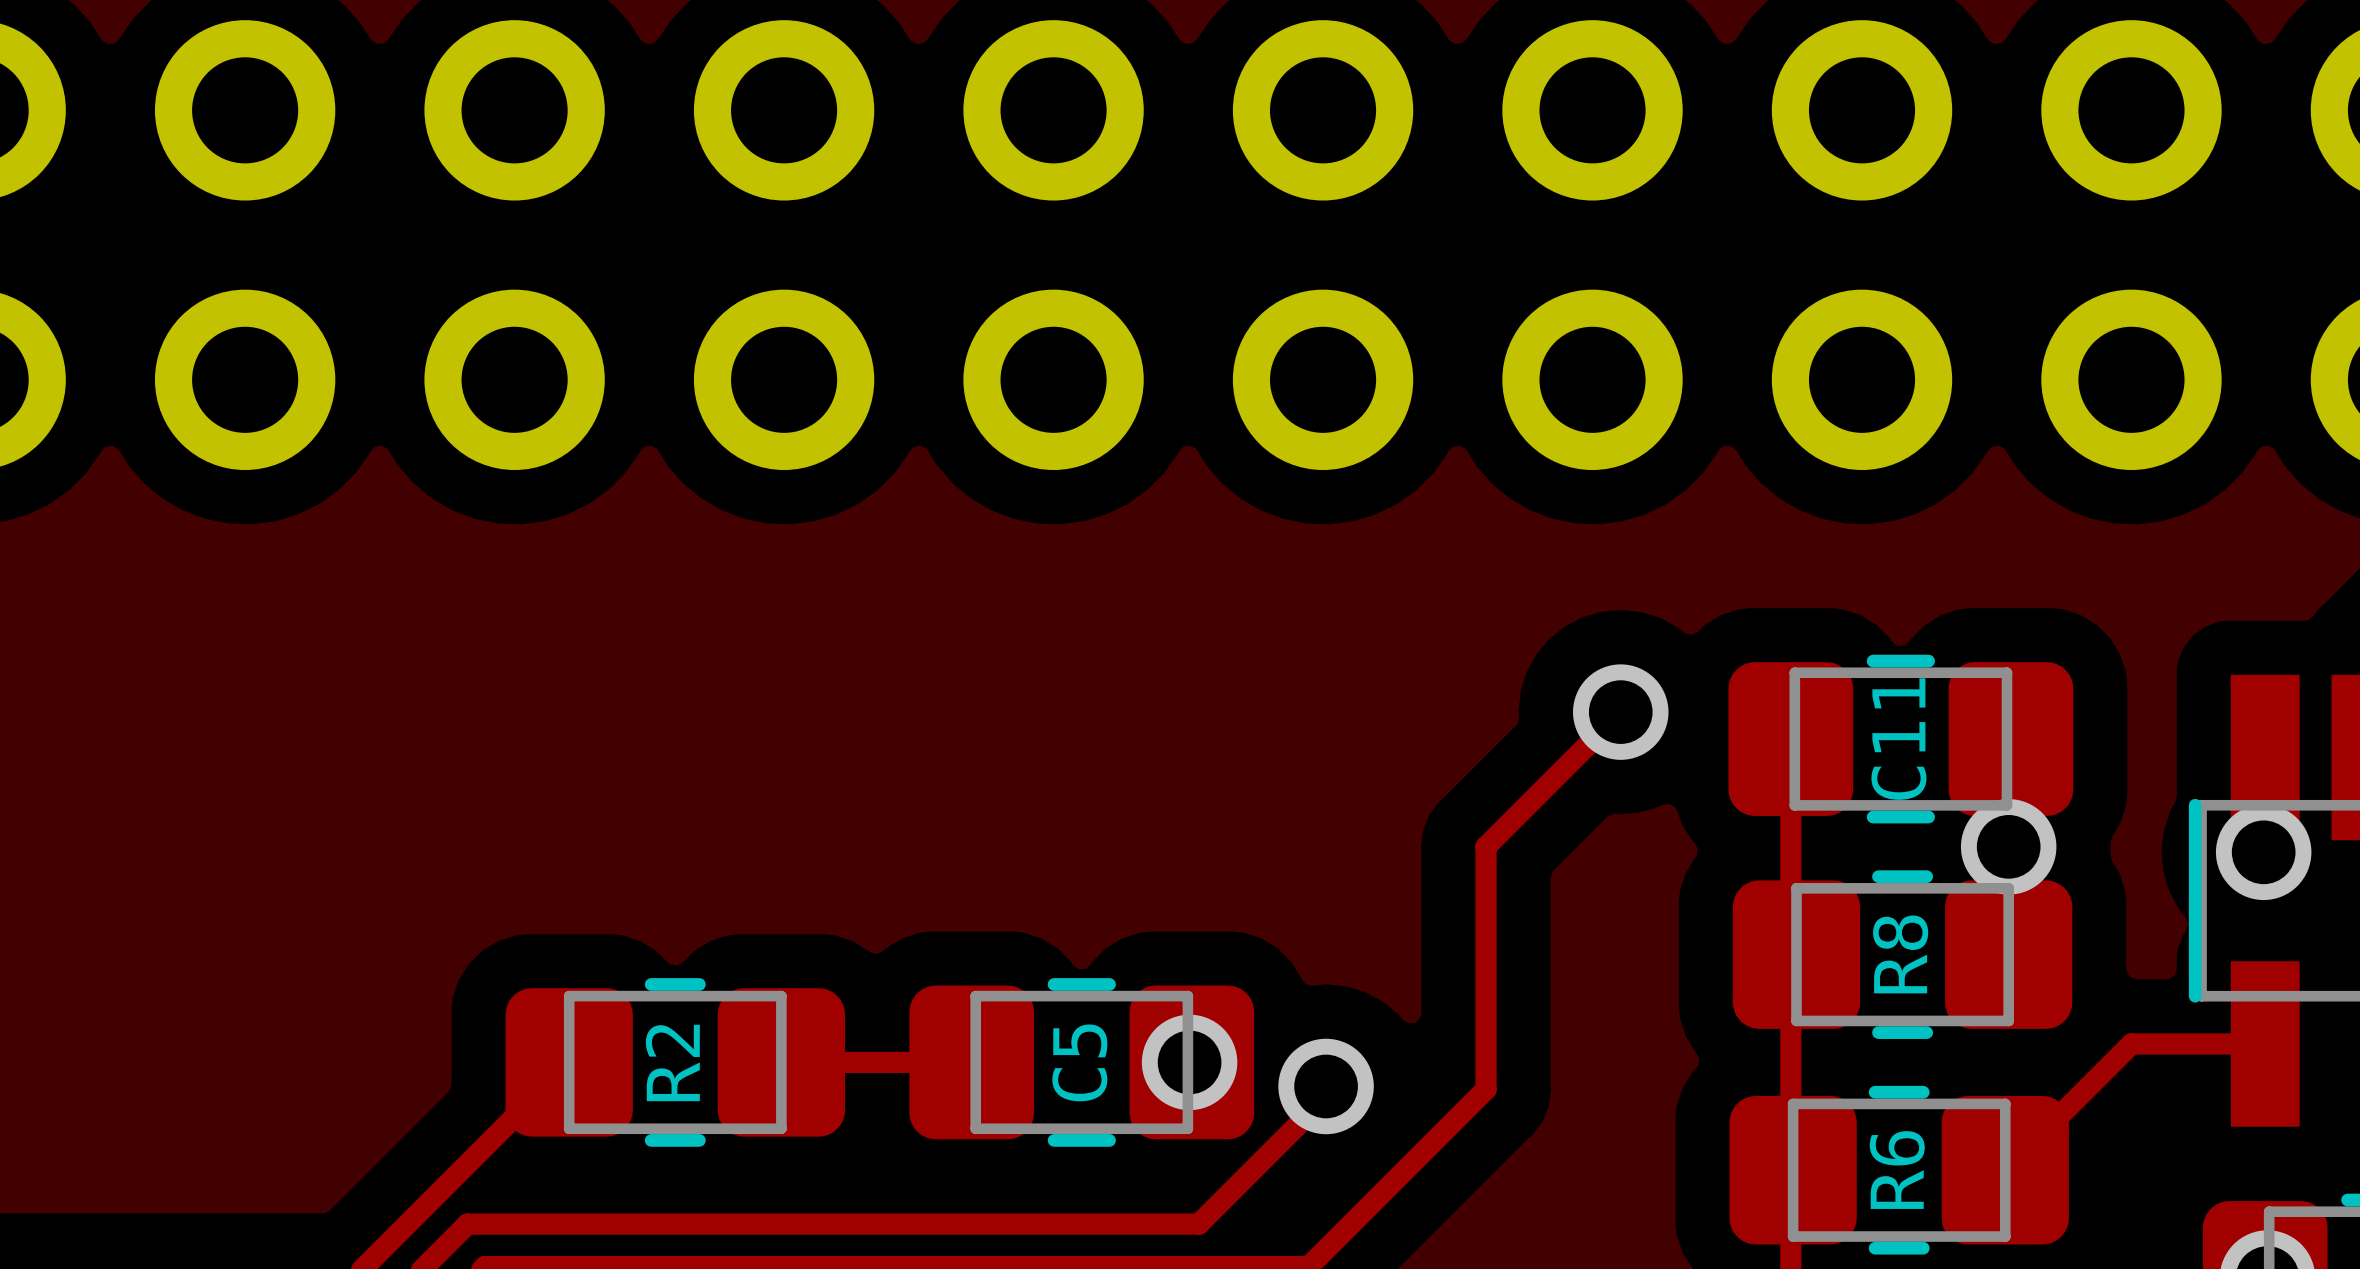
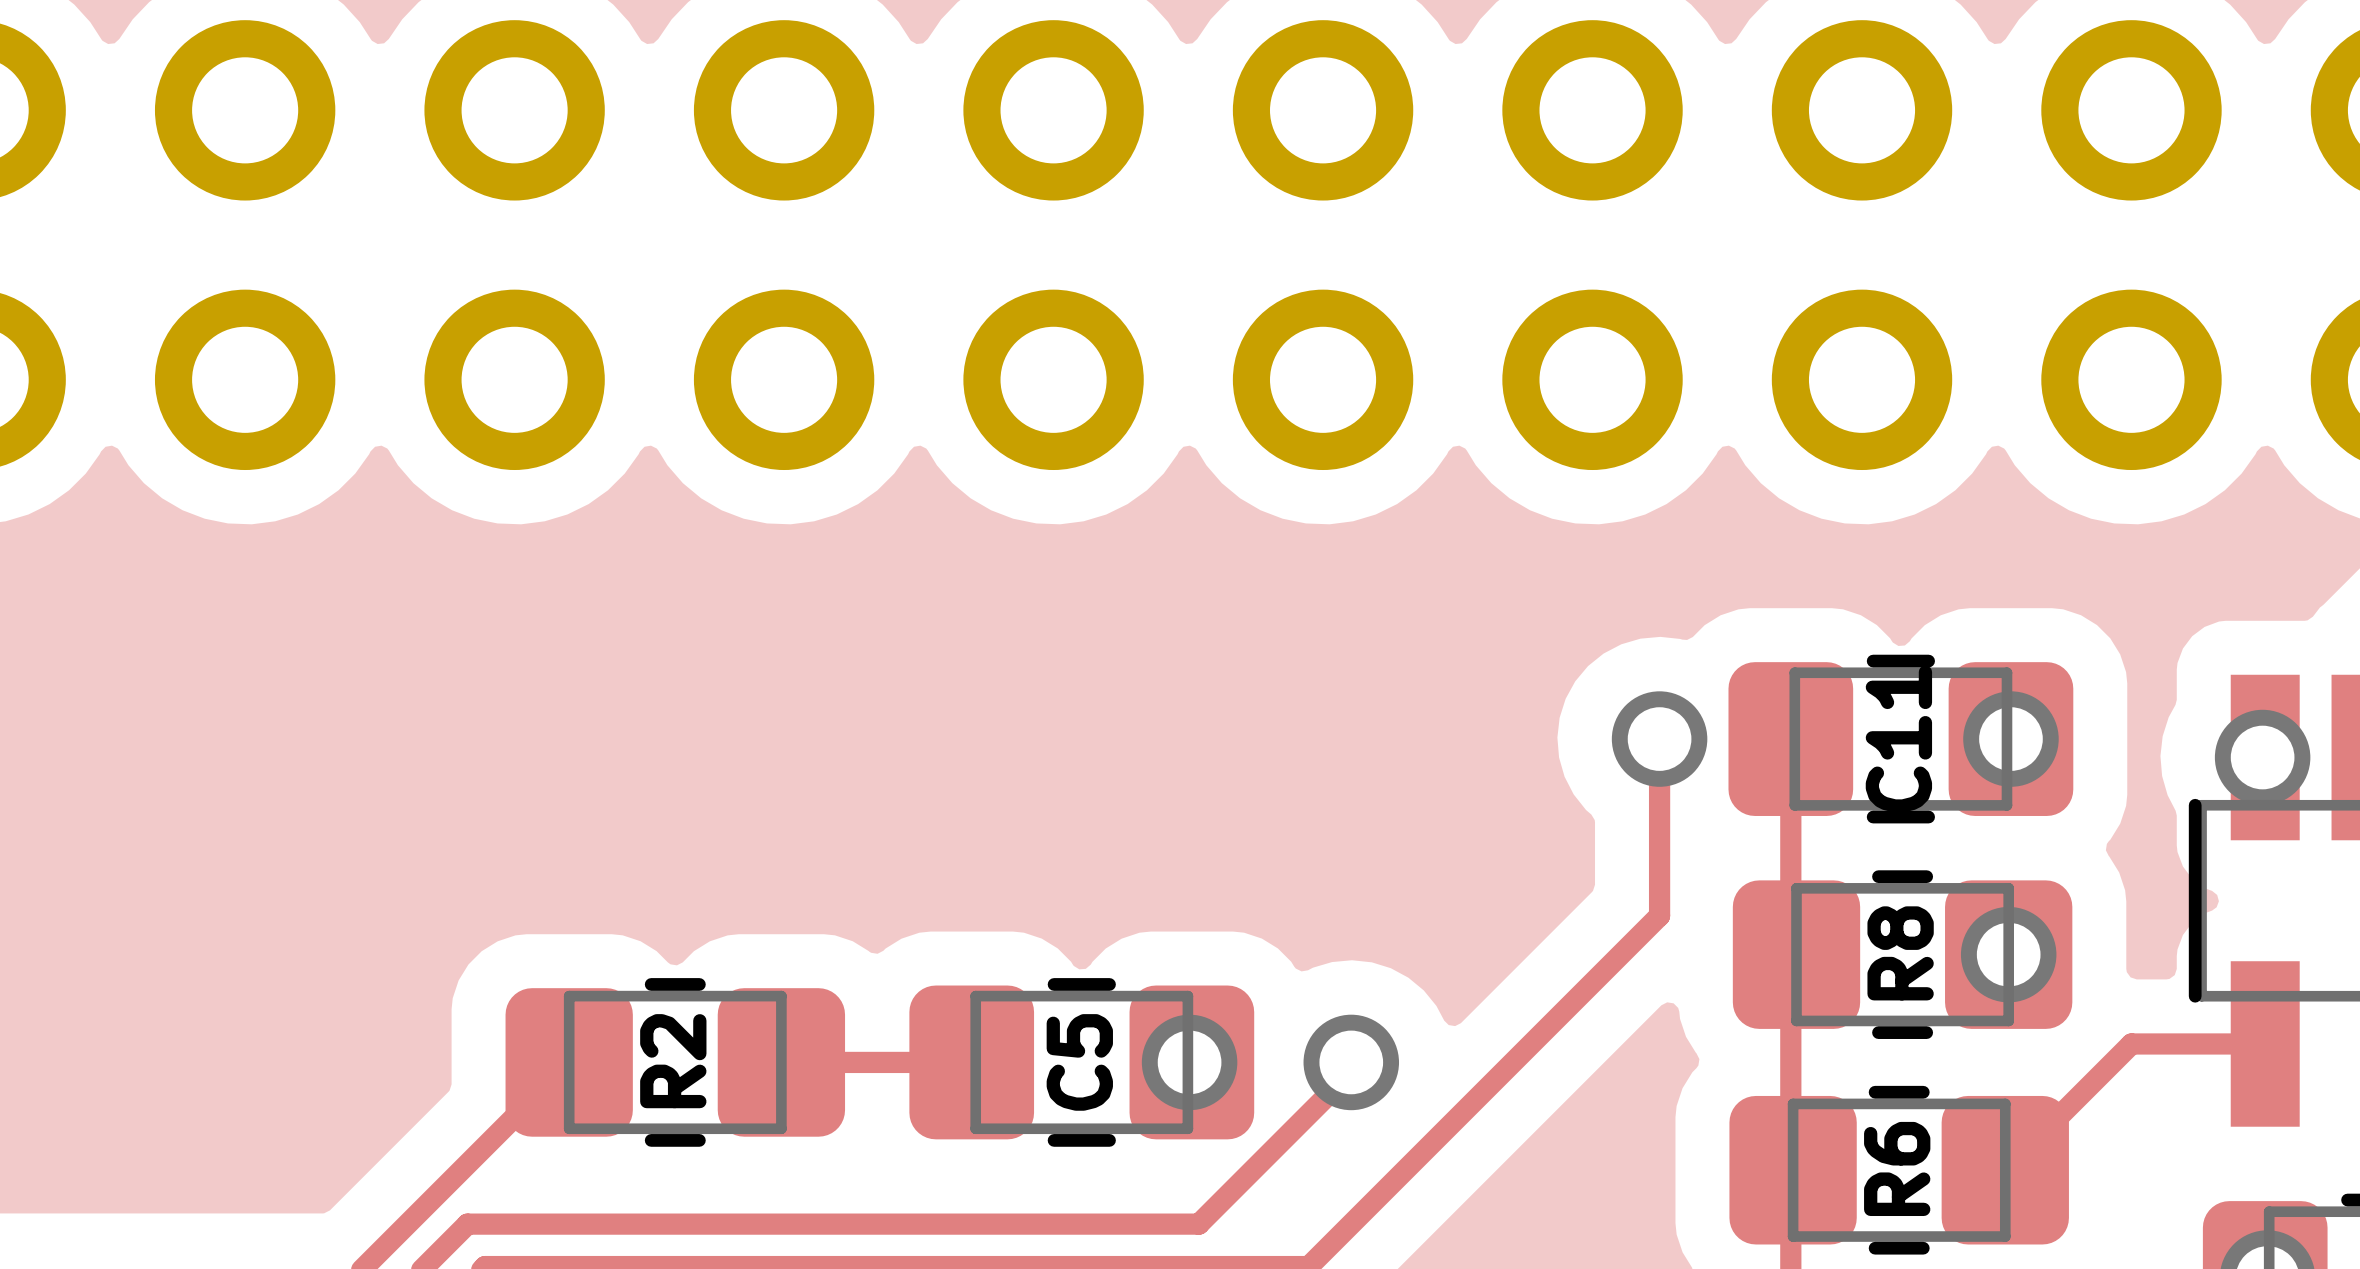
track: (1620, 712) (1486, 846) (1486, 1089) -> (1659, 739) (1659, 915) (1486, 1089)
via position: (1620, 712) -> (1659, 739)
via: none -> (2010, 739)
via: (2008, 846) -> none
via position: (2263, 852) -> (2262, 757)
via: none -> (2008, 954)
via position: (1326, 1086) -> (1351, 1062)

